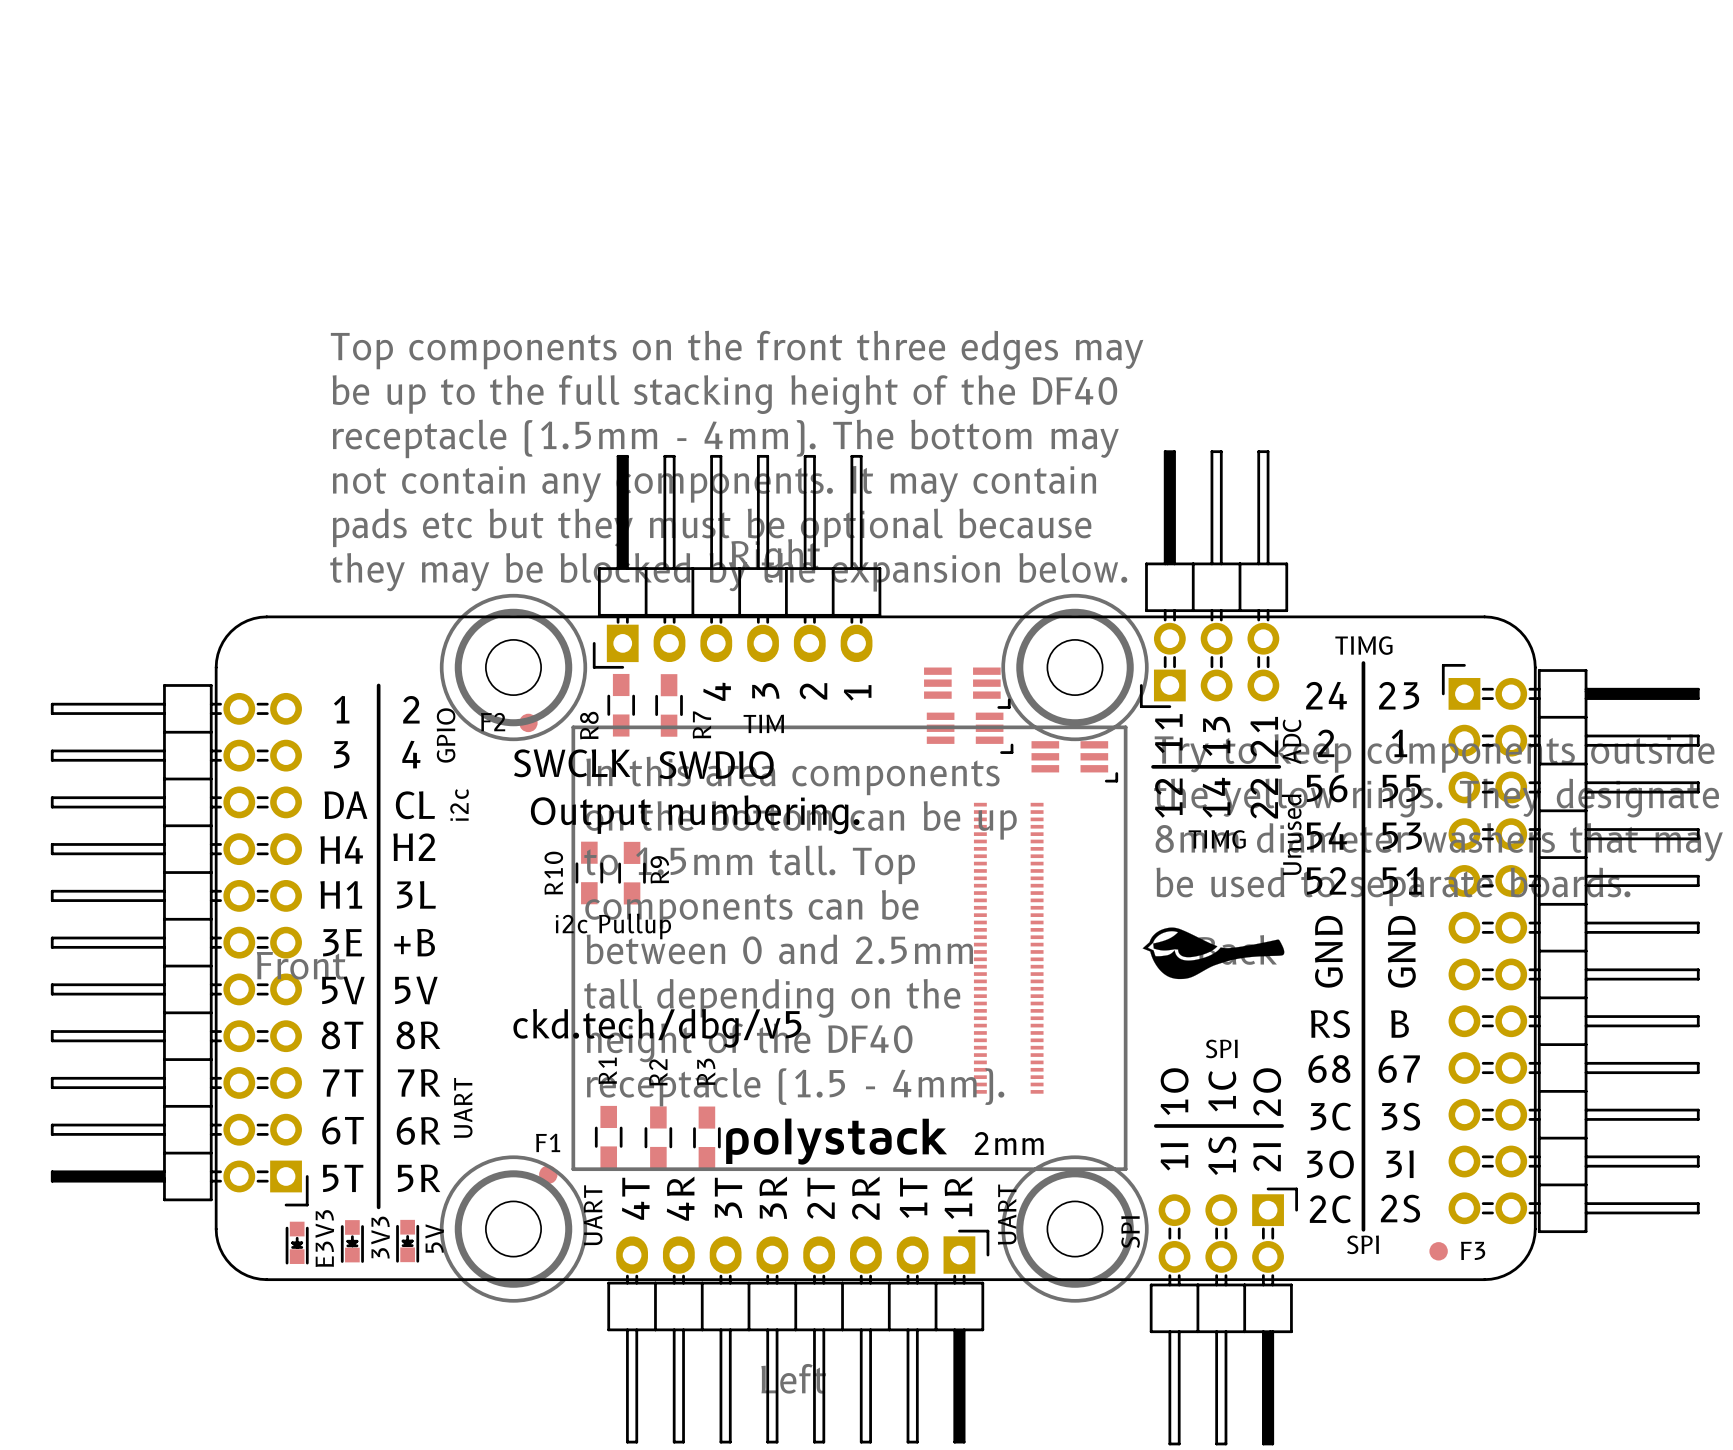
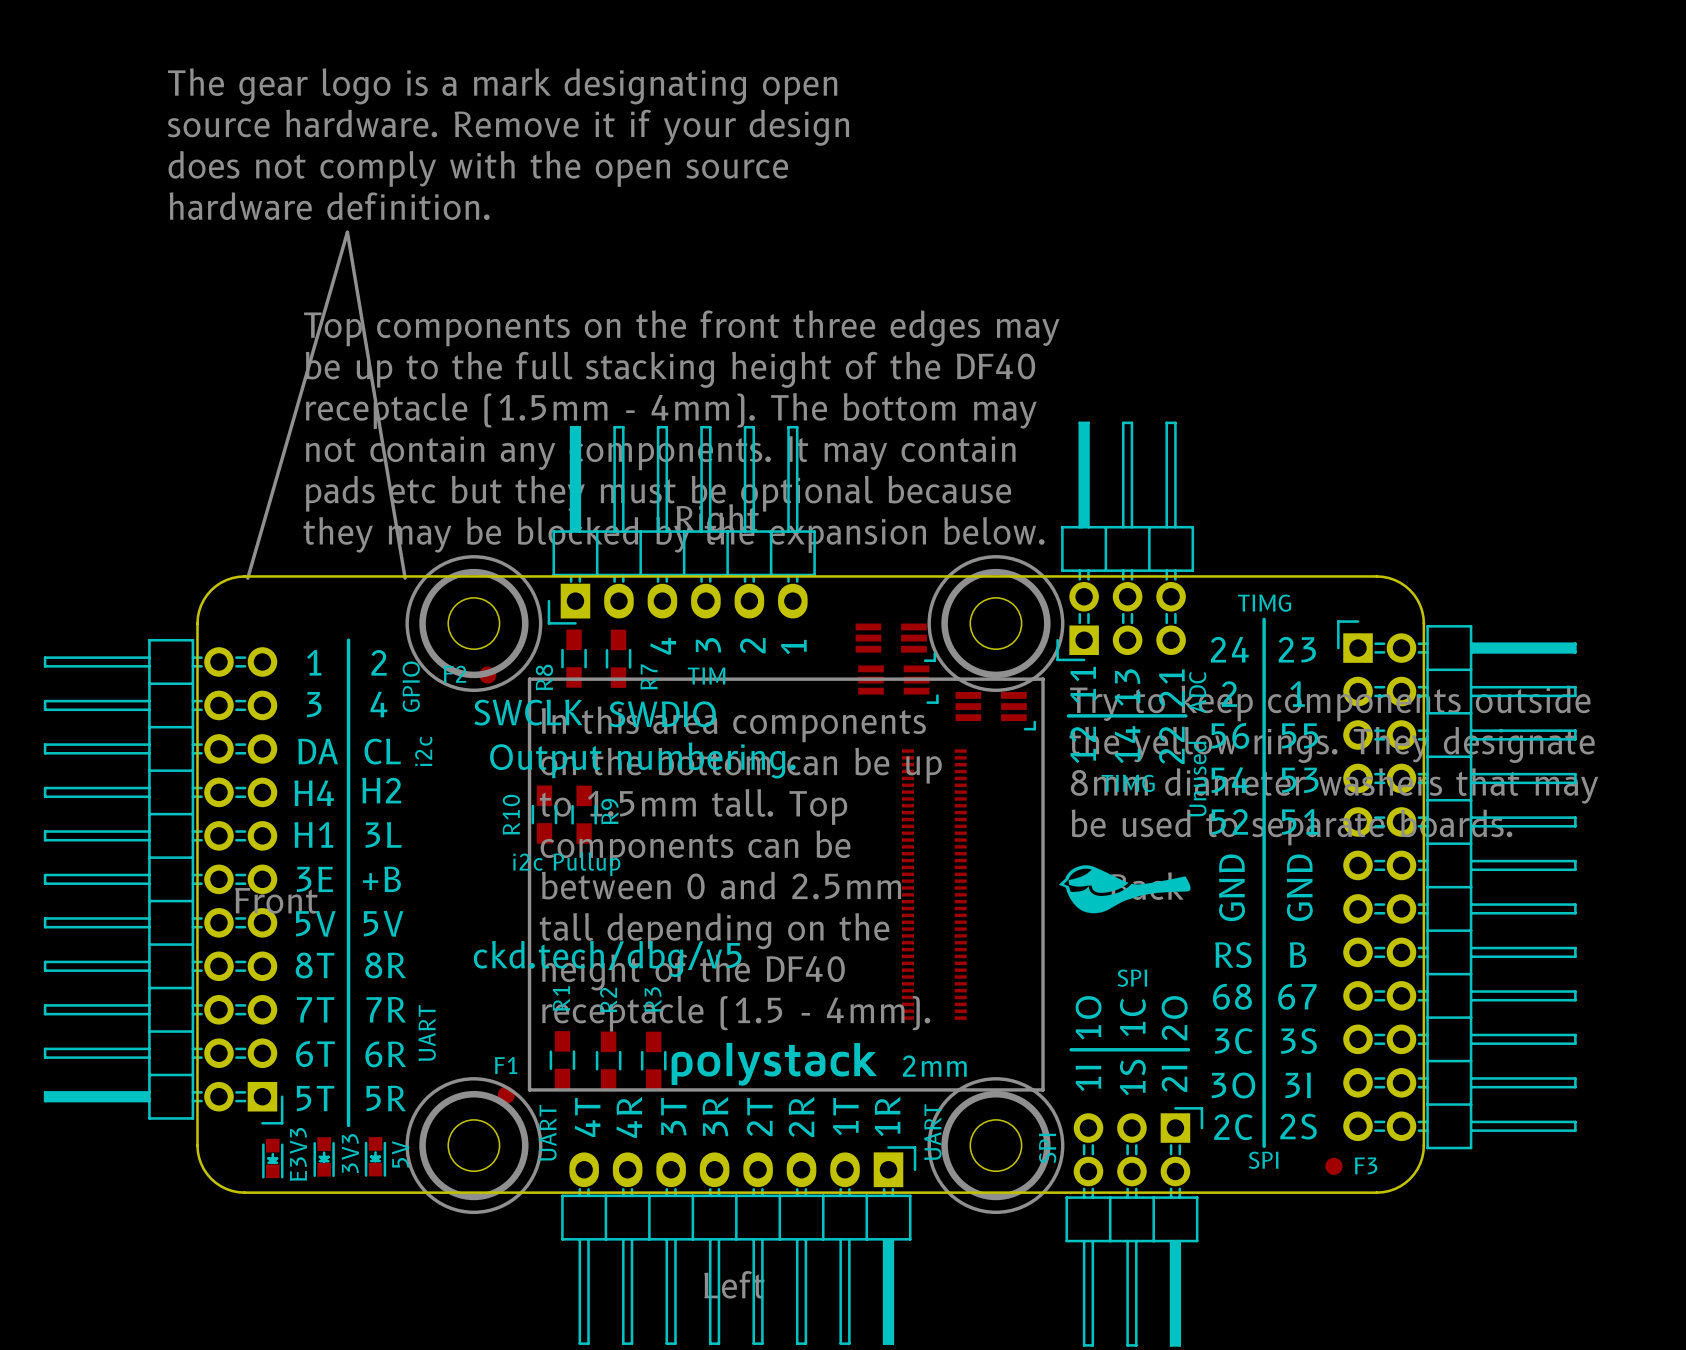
text: none -> The gear logo is a mark designating open (502, 86)
text: none -> source hardware. Remove it if your design (508, 127)
text: none -> does not comply with the open source (478, 168)
text: none -> hardware definition. (329, 206)
line: none -> (247, 578) (347, 232) (405, 578)

